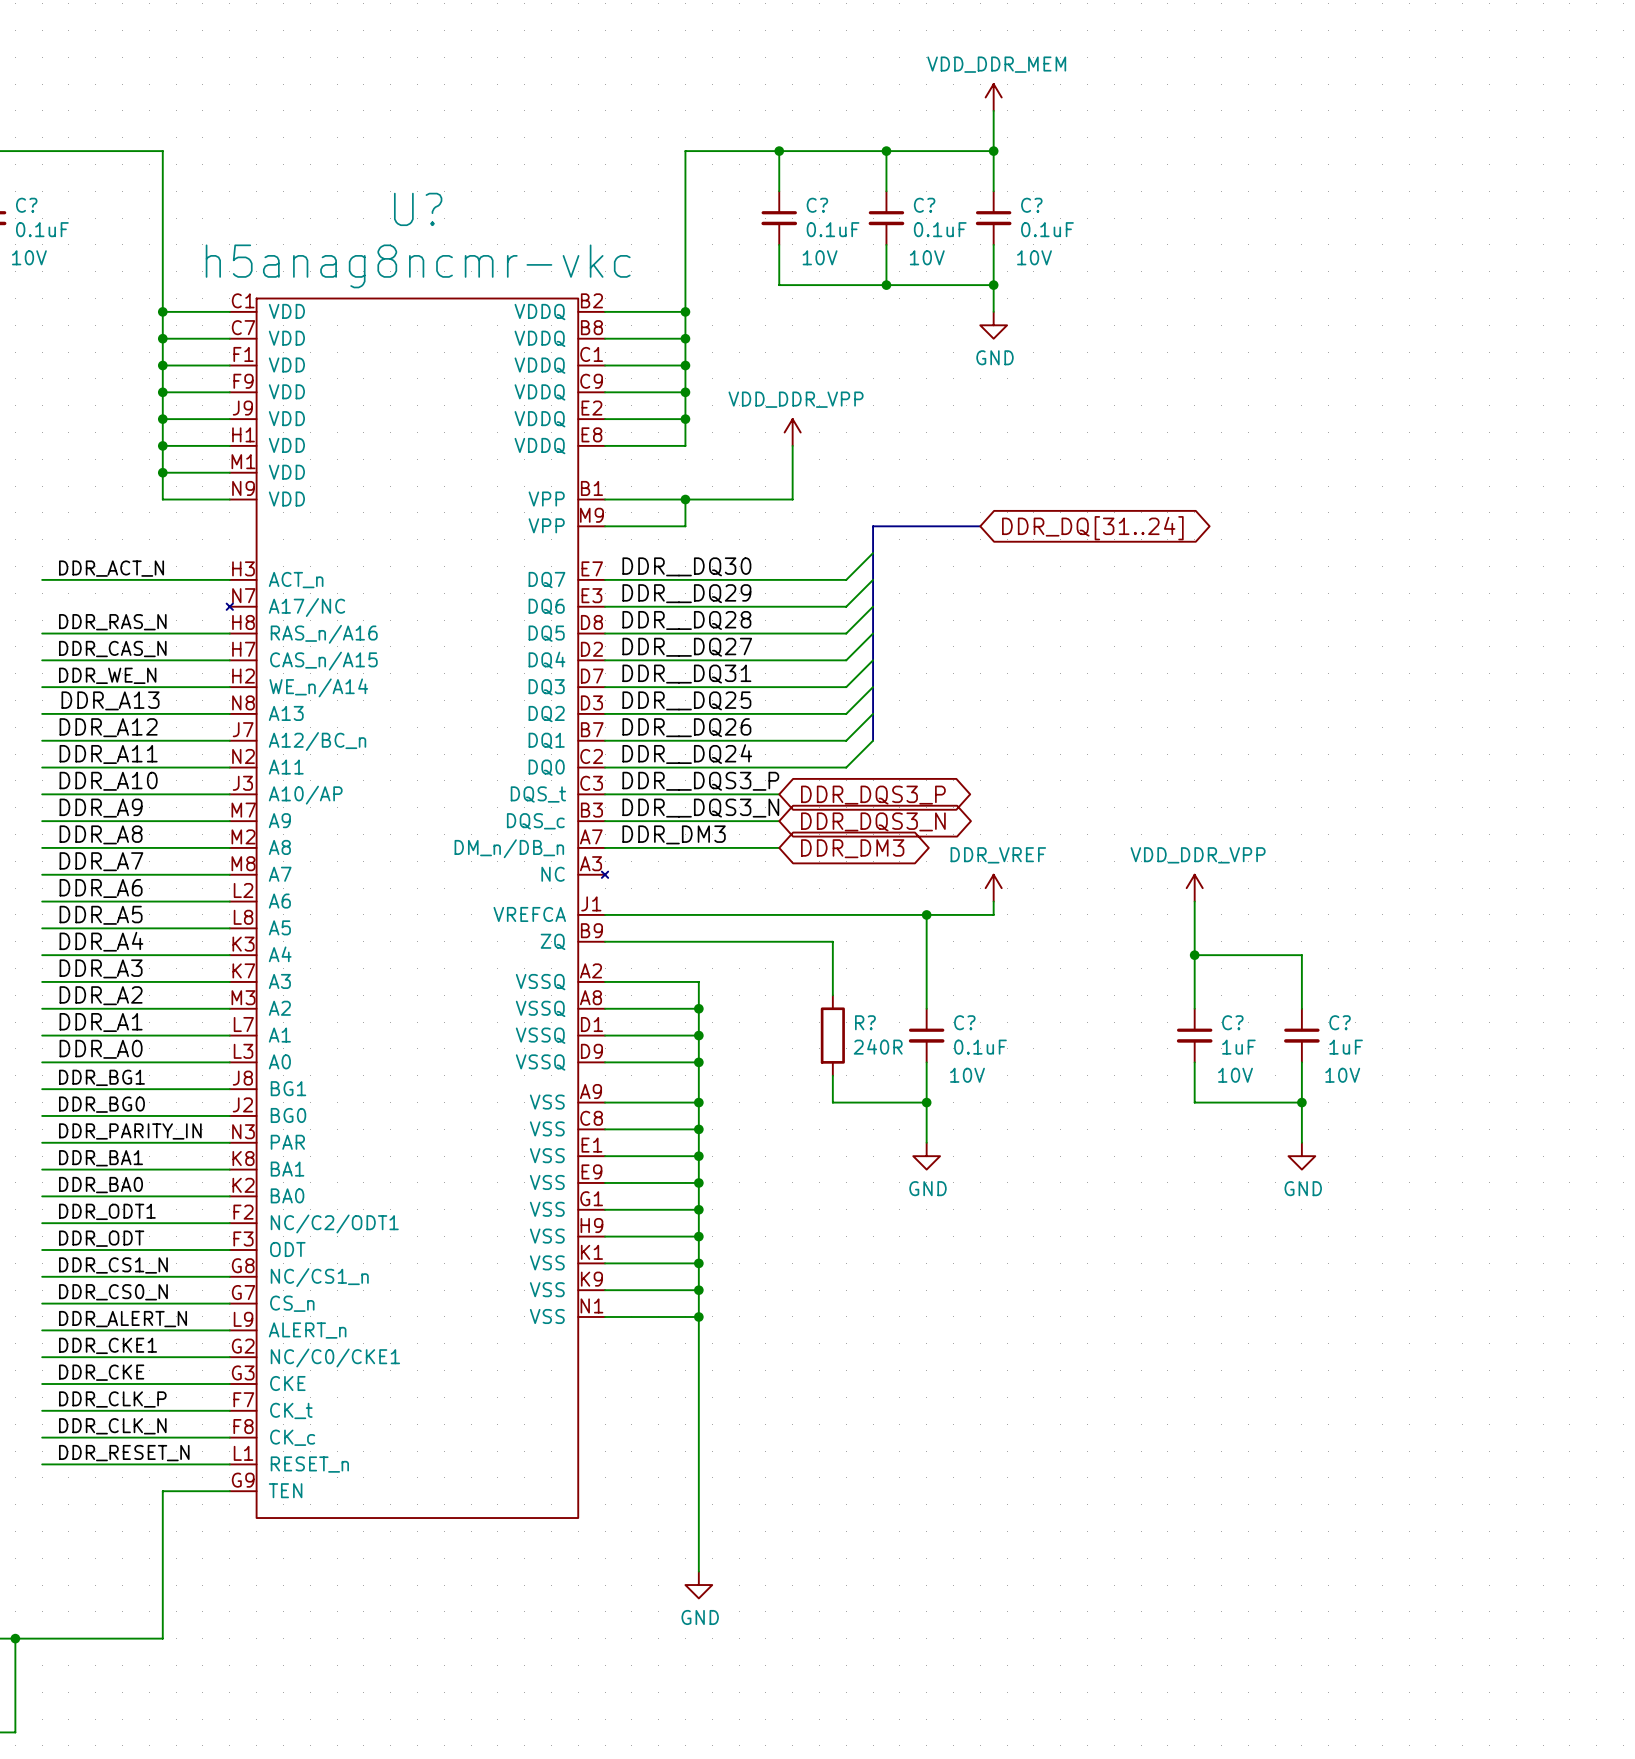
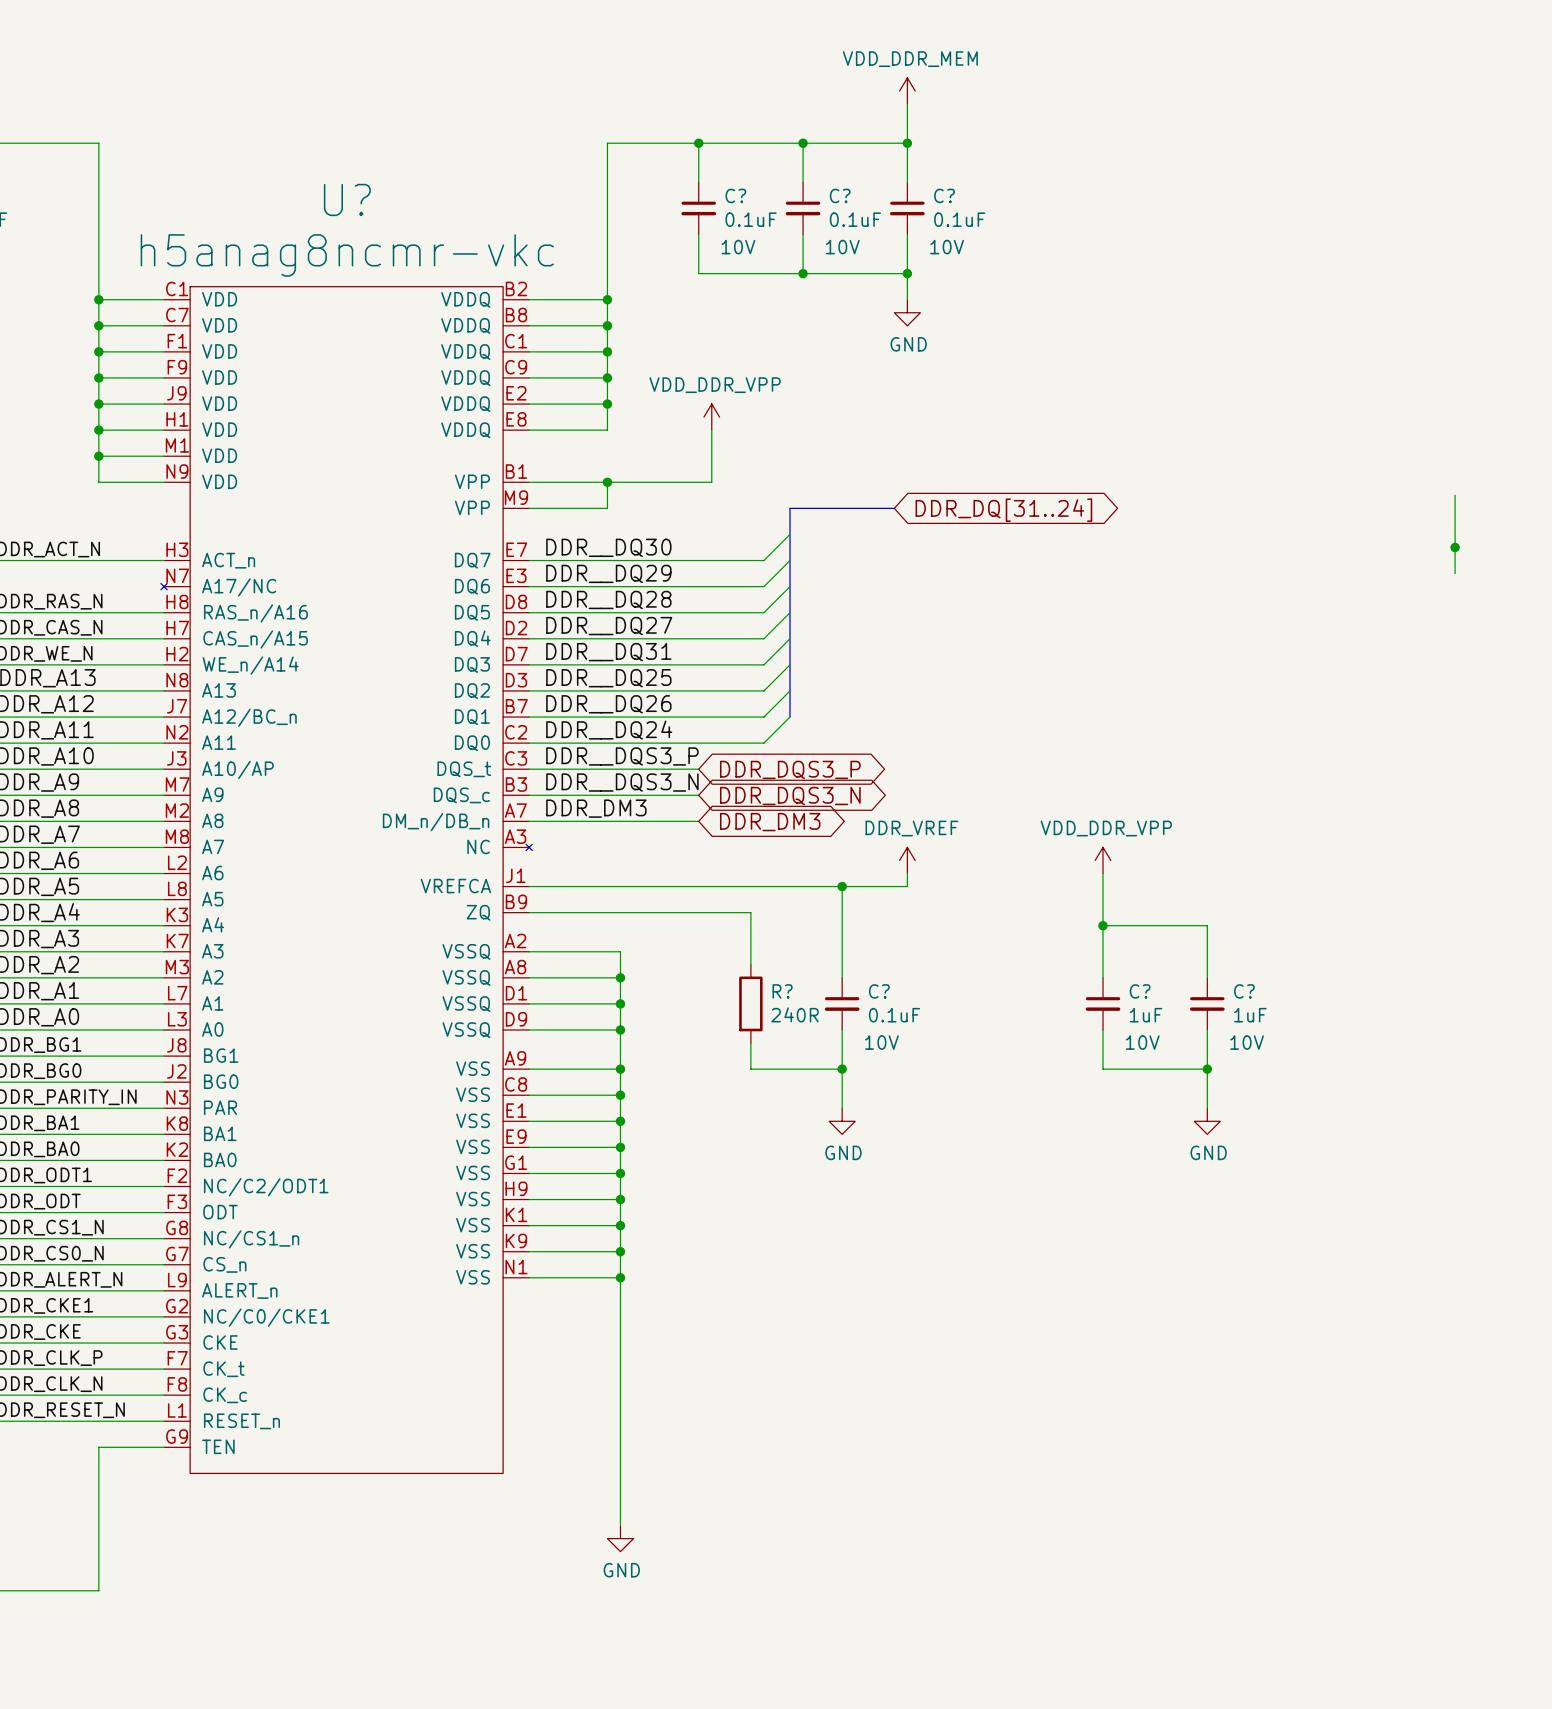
wire: none -> (1455, 495) (1455, 573)
junction: none -> (1455, 547)

